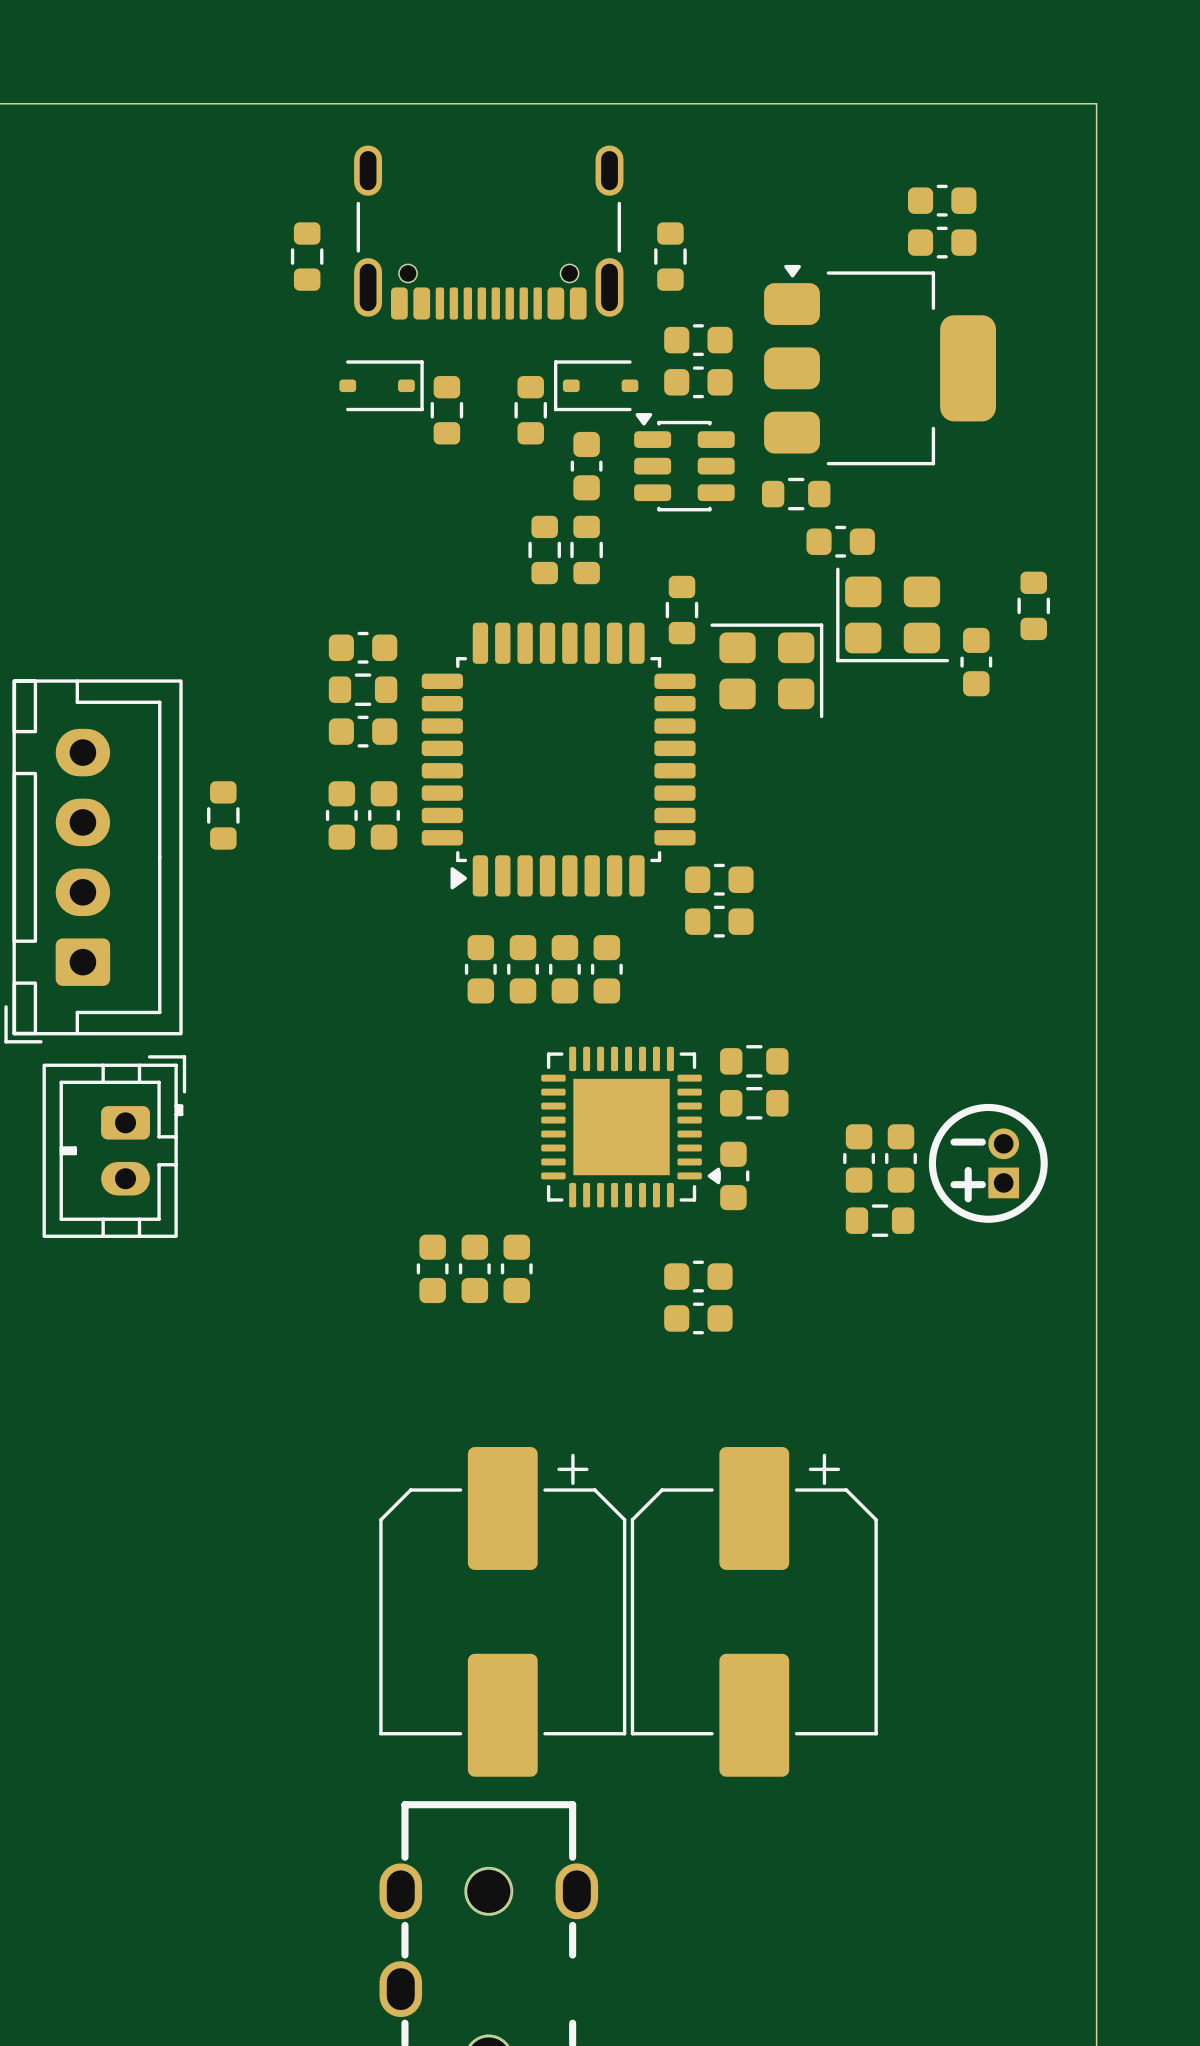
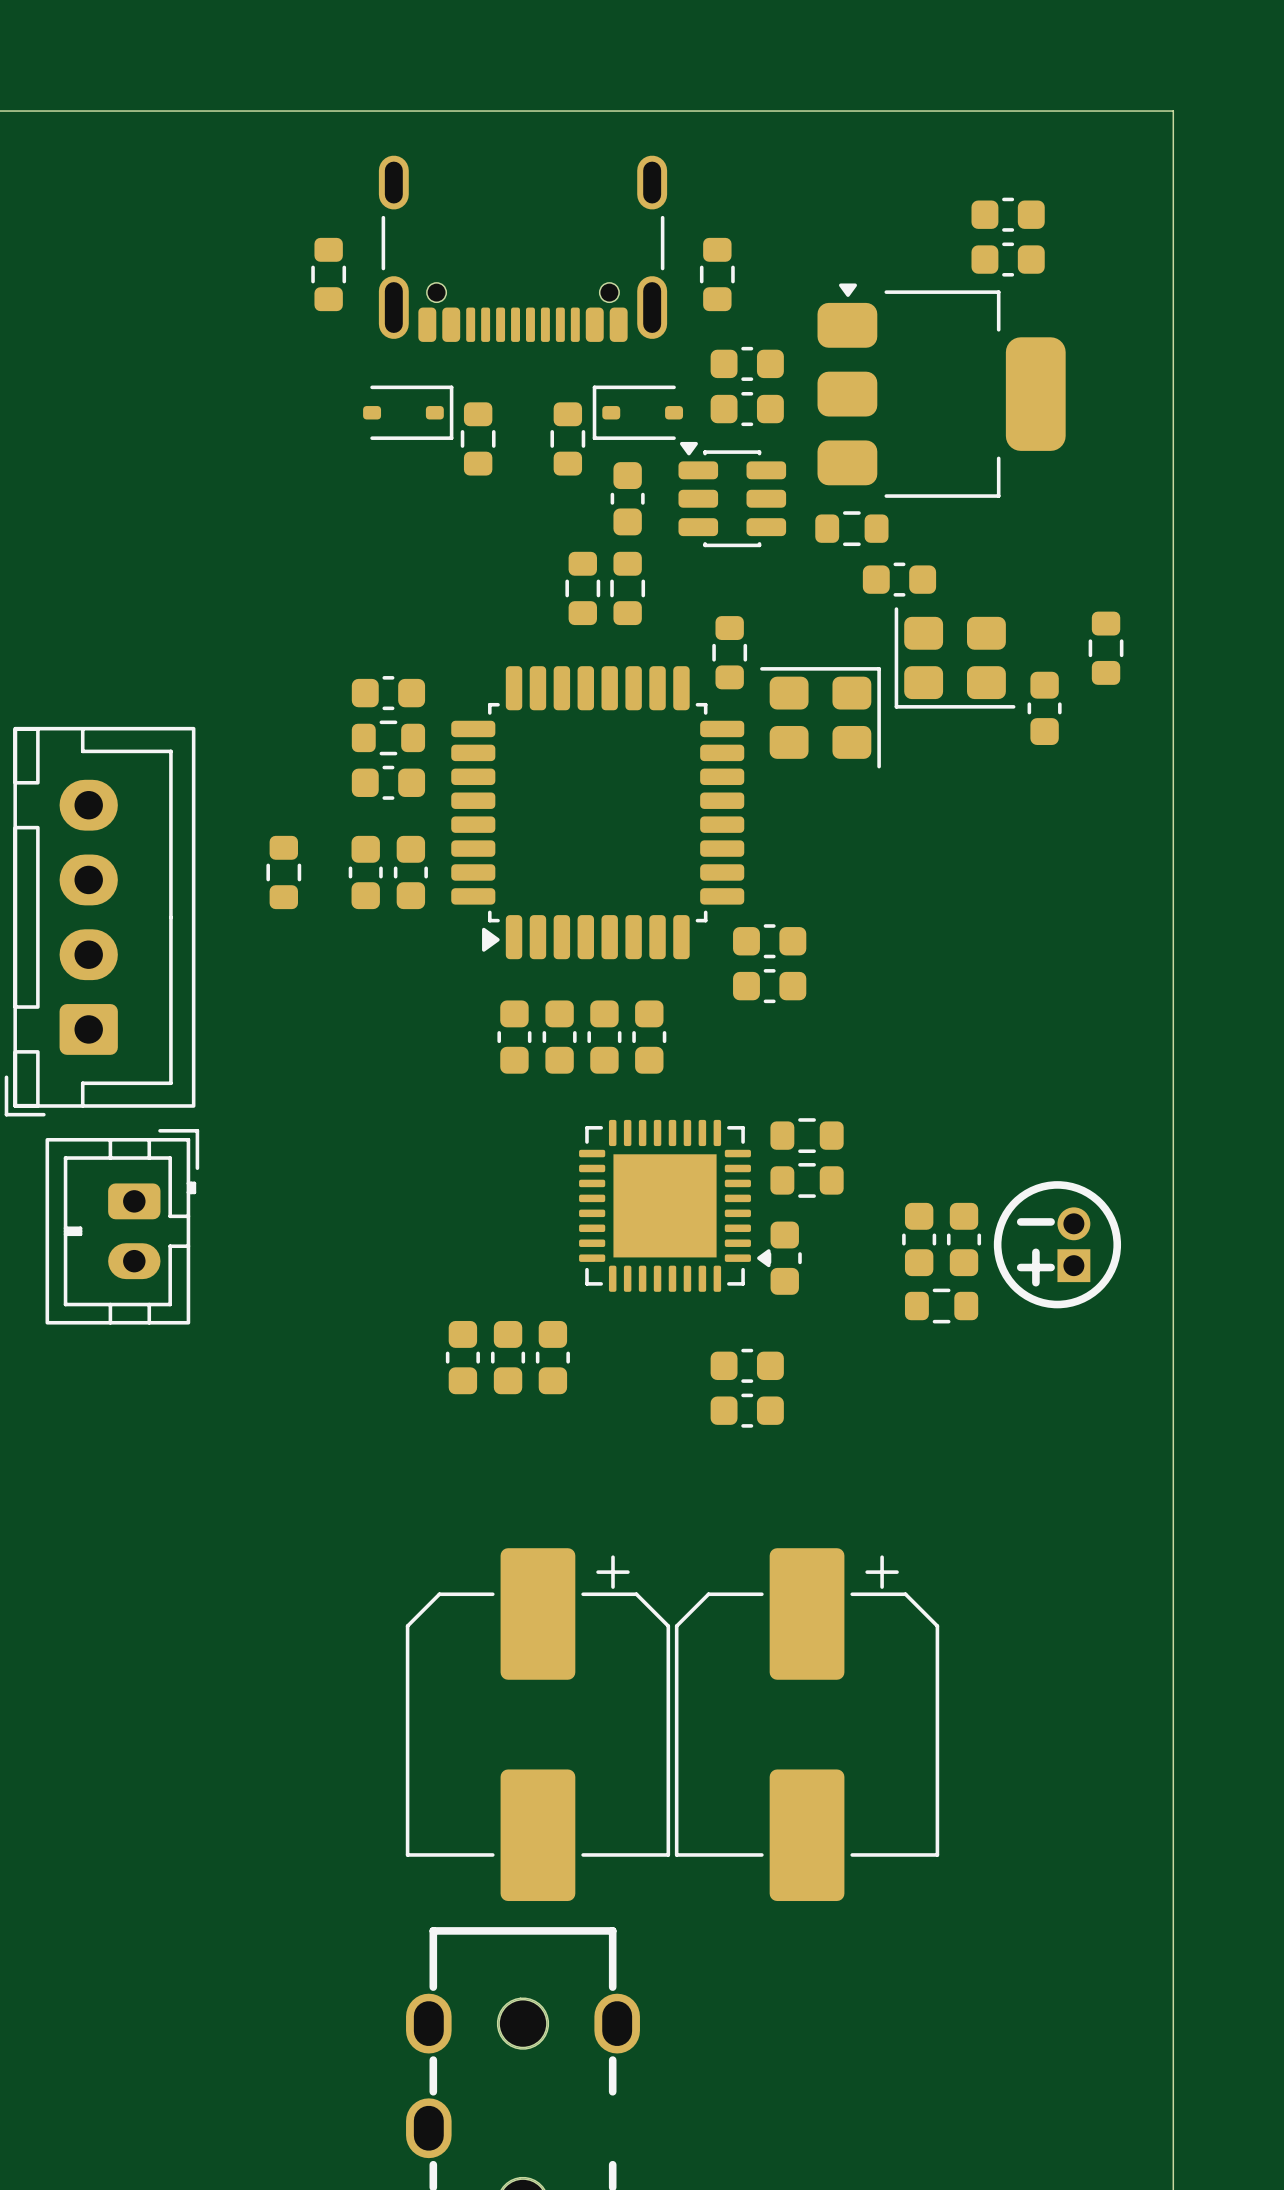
part position: (223, 815) -> (283, 872)

